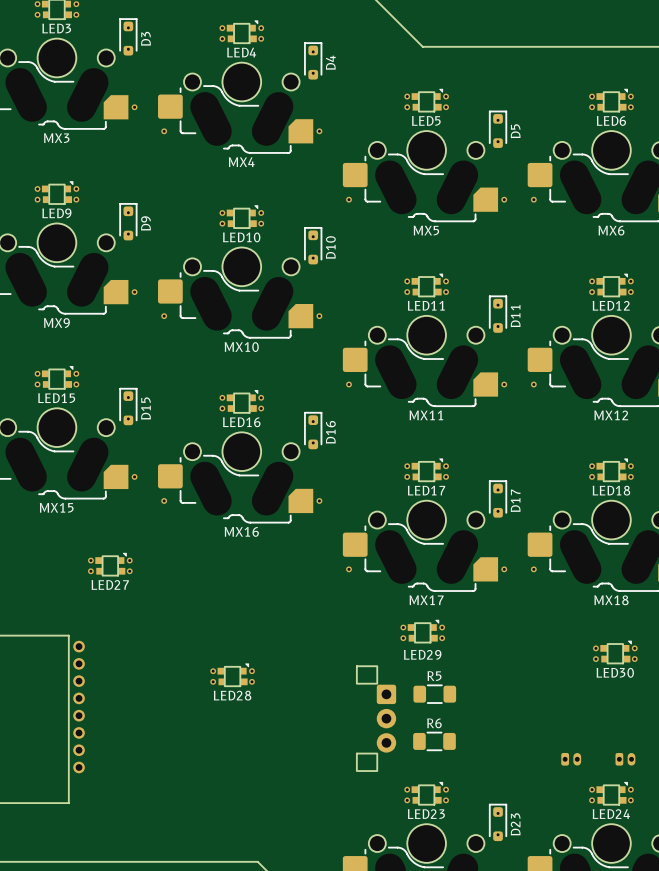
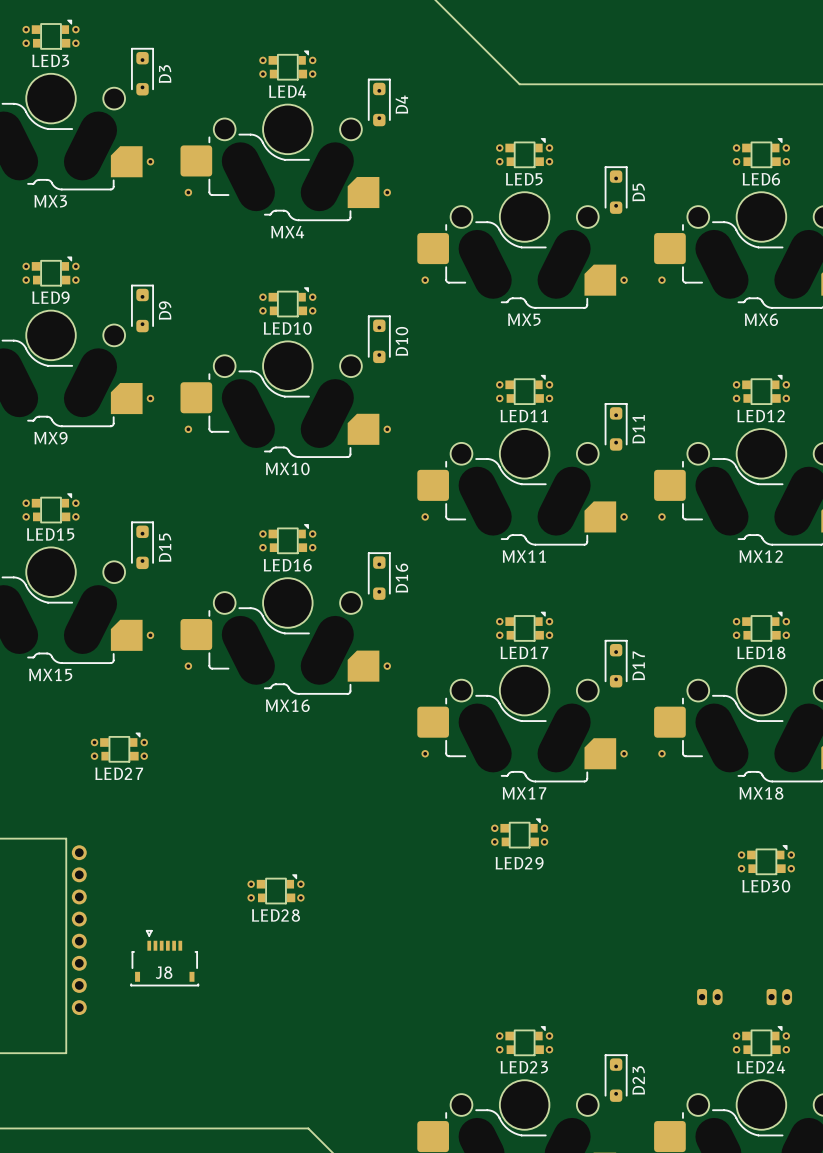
R5: (434, 694) -> none
part: (376, 718) -> none
J8: none -> (164, 958)
R6: (434, 741) -> none

